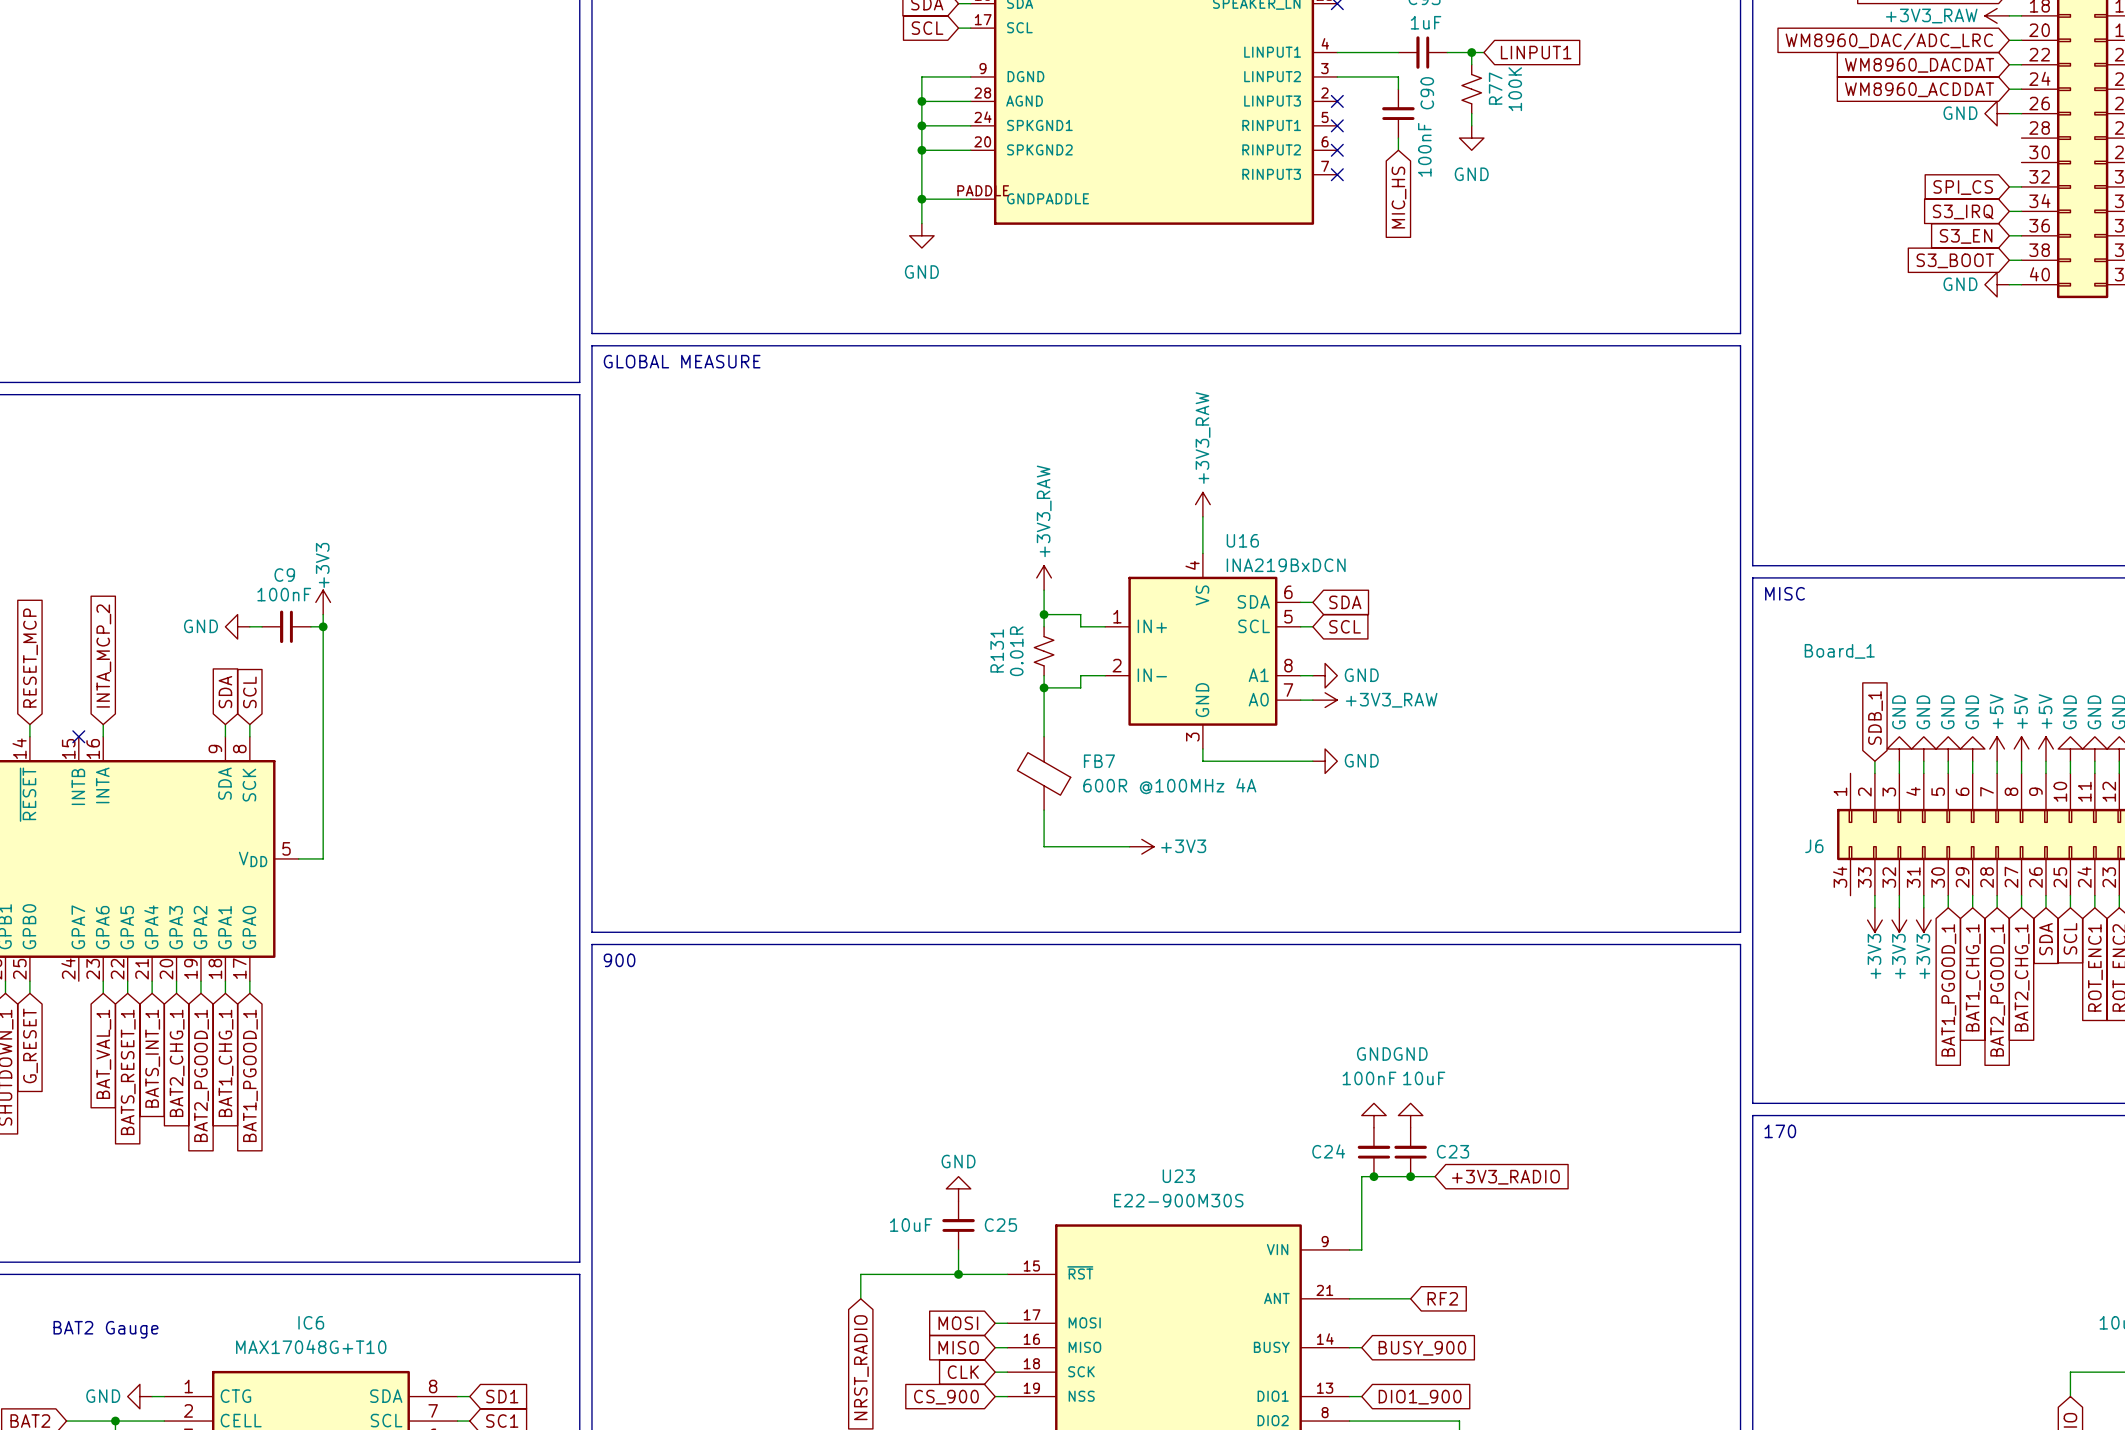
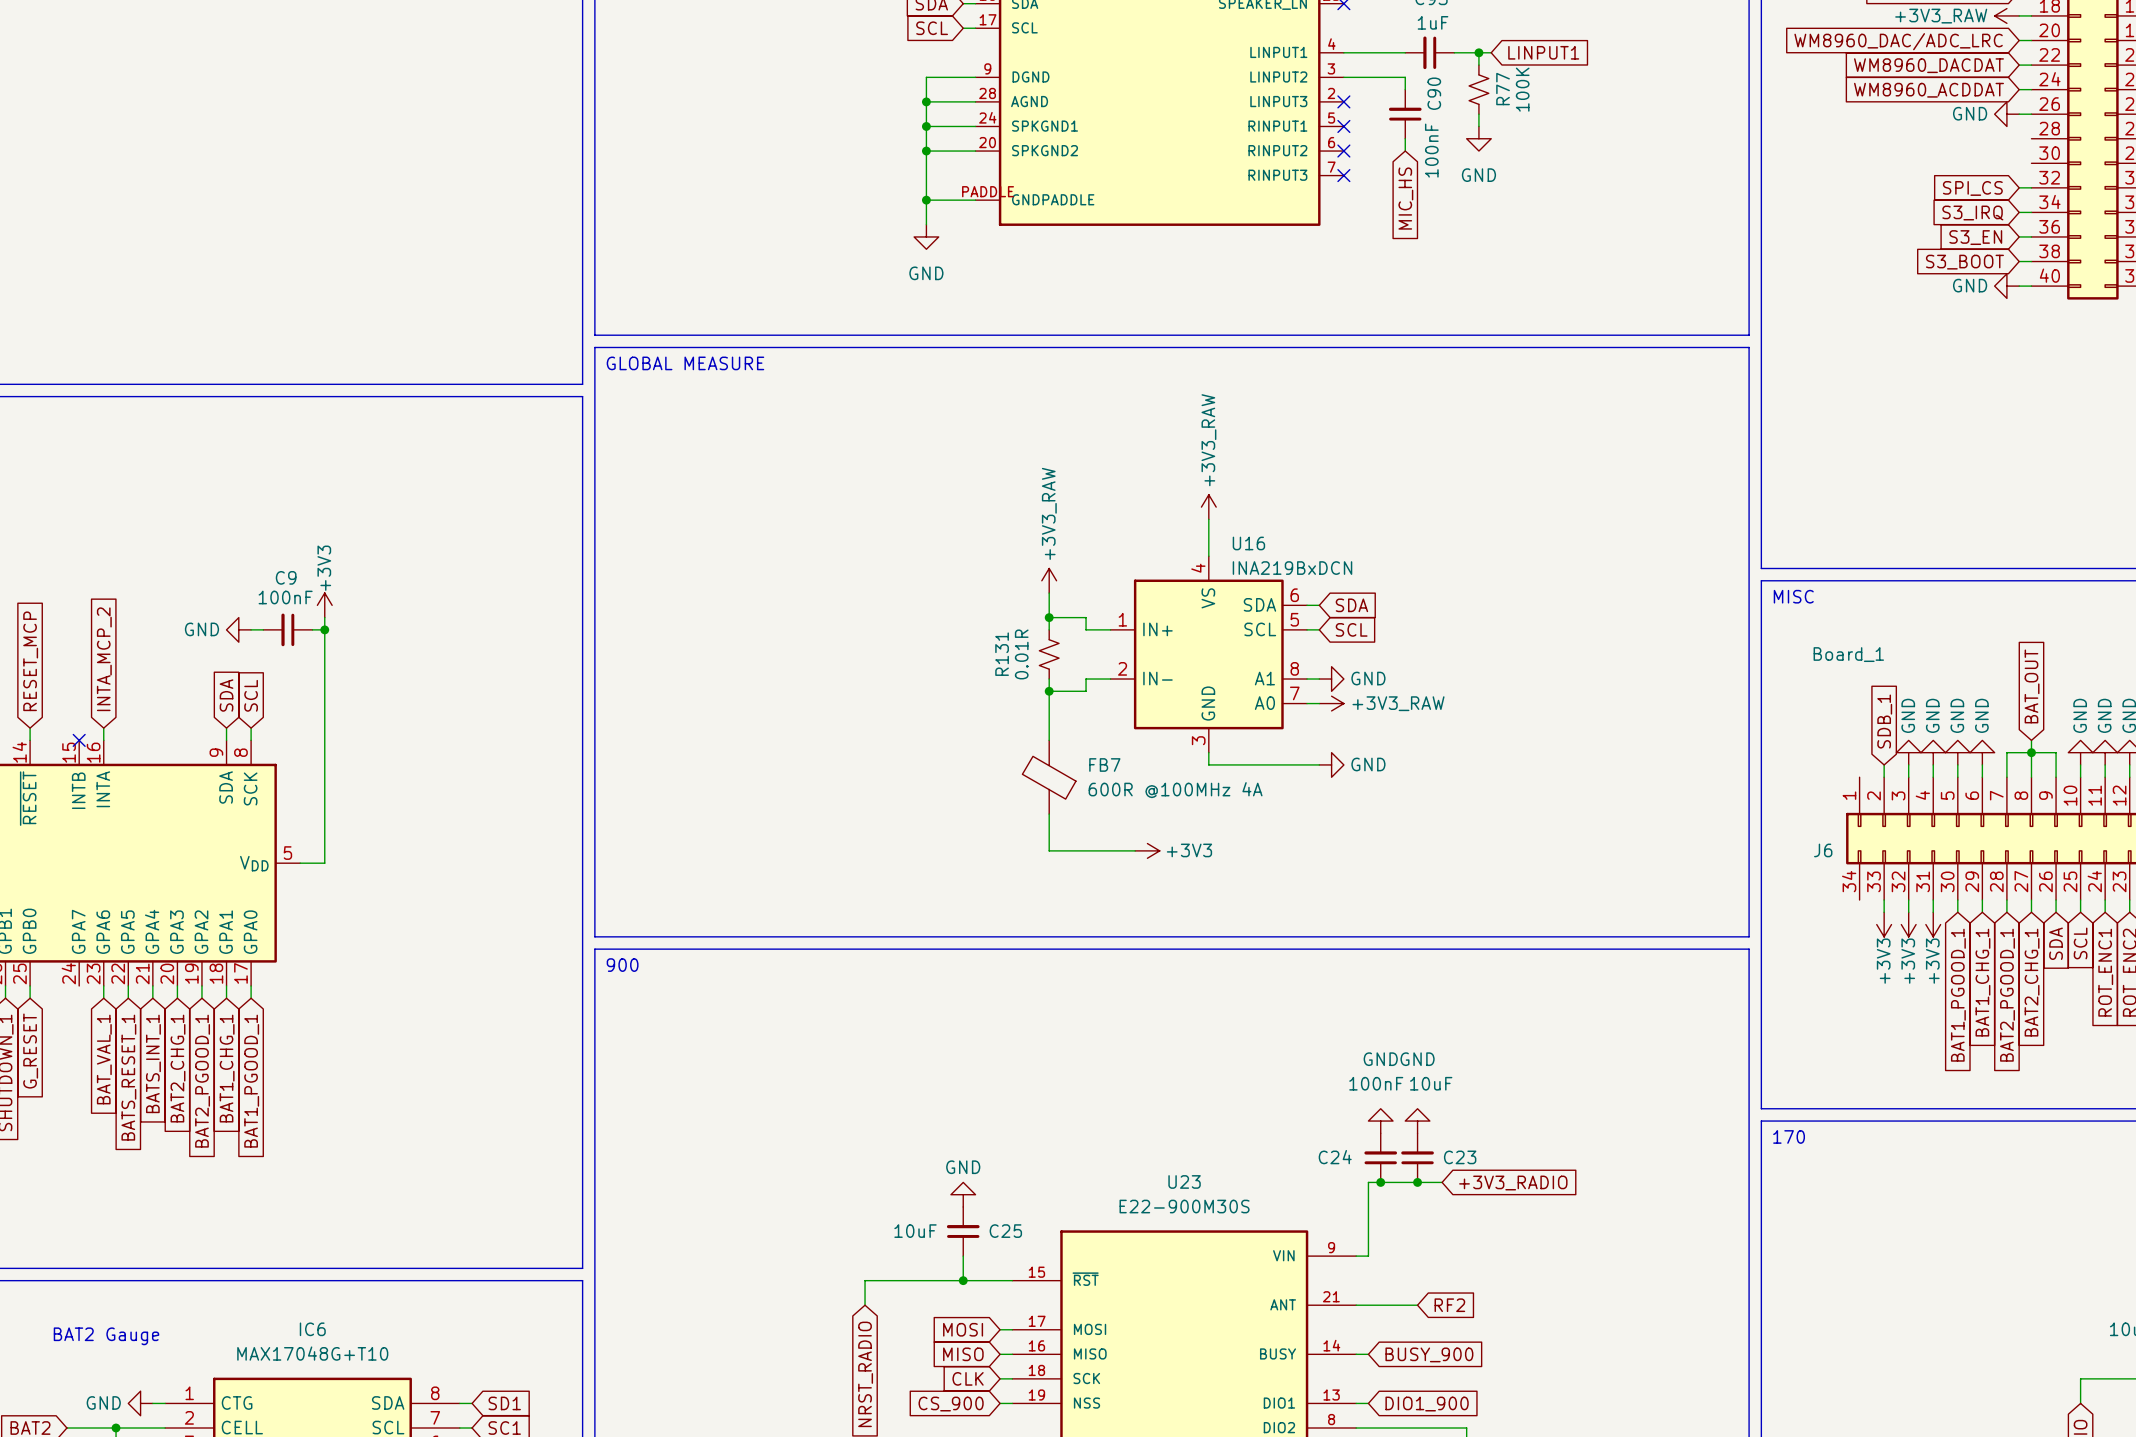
global label: none -> BAT_OUT (2032, 686)
power symbol: +5V (1997, 749) -> none
power symbol: +5V (2021, 749) -> none
junction: none -> (2031, 752)
power symbol: +5V (2045, 749) -> none
wire: none -> (2006, 764) (2006, 752) (2056, 752) (2056, 764)

